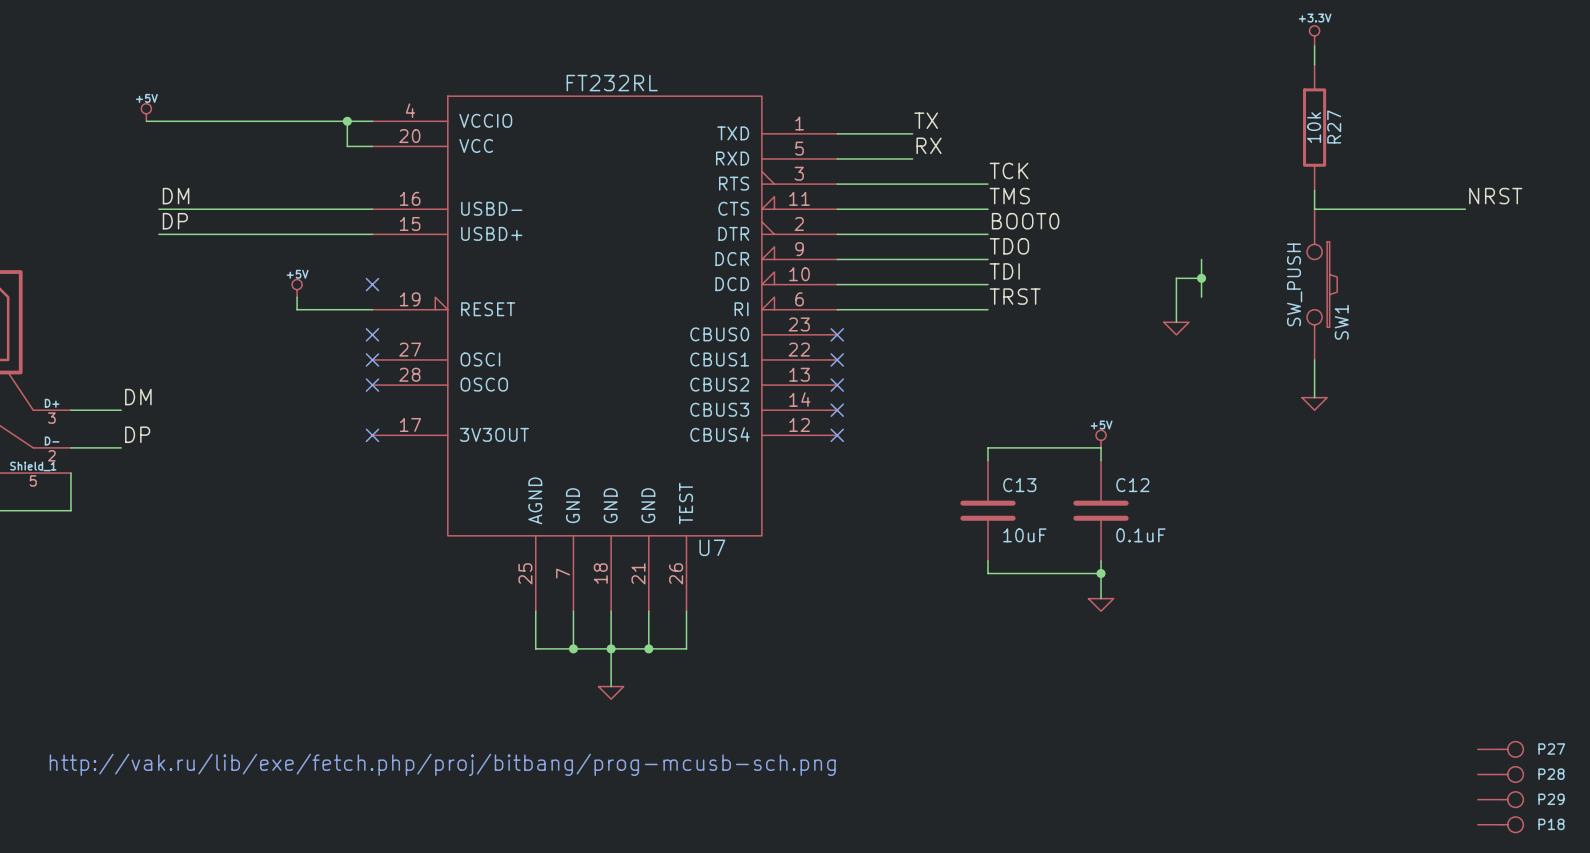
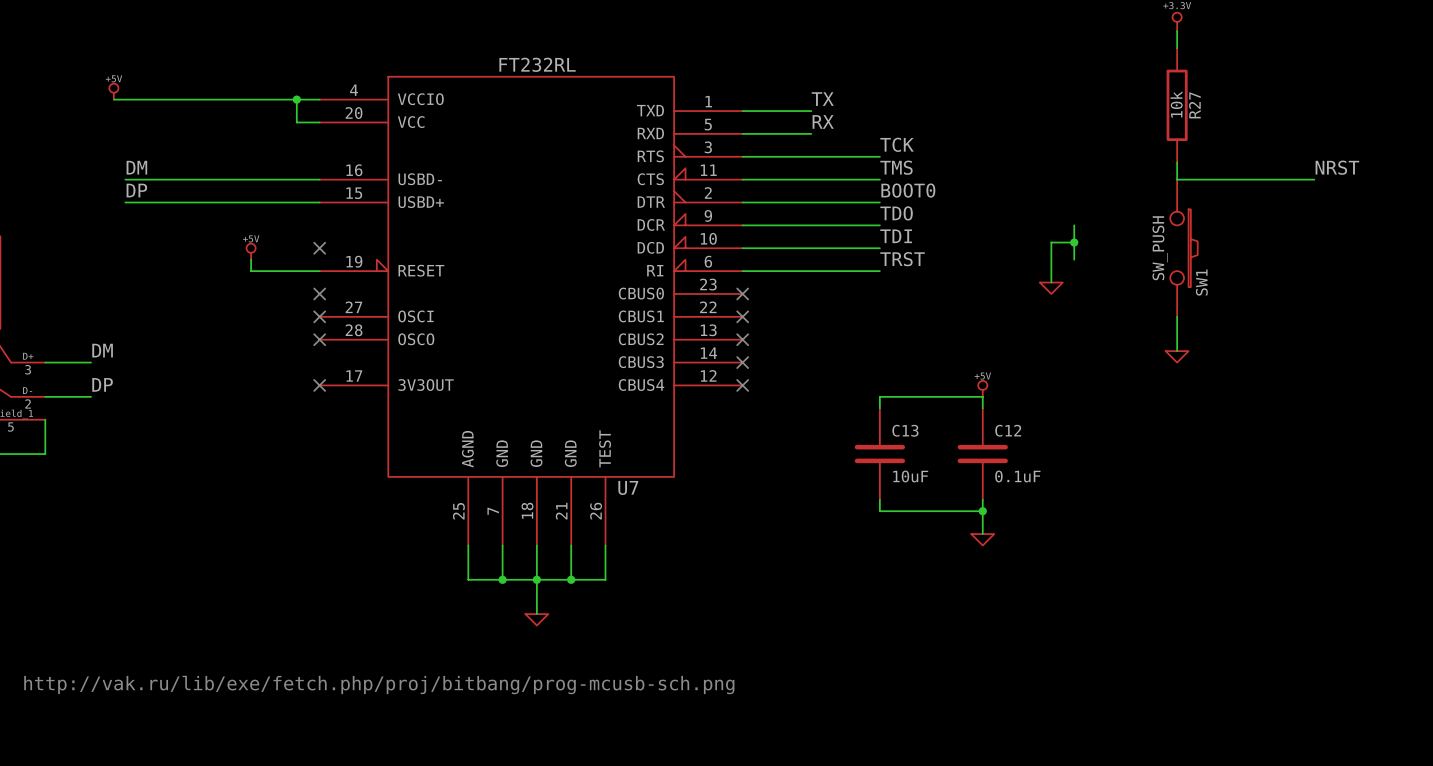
P27: (1500, 749) -> none
P28: (1500, 774) -> none
P29: (1500, 799) -> none
P18: (1500, 824) -> none

